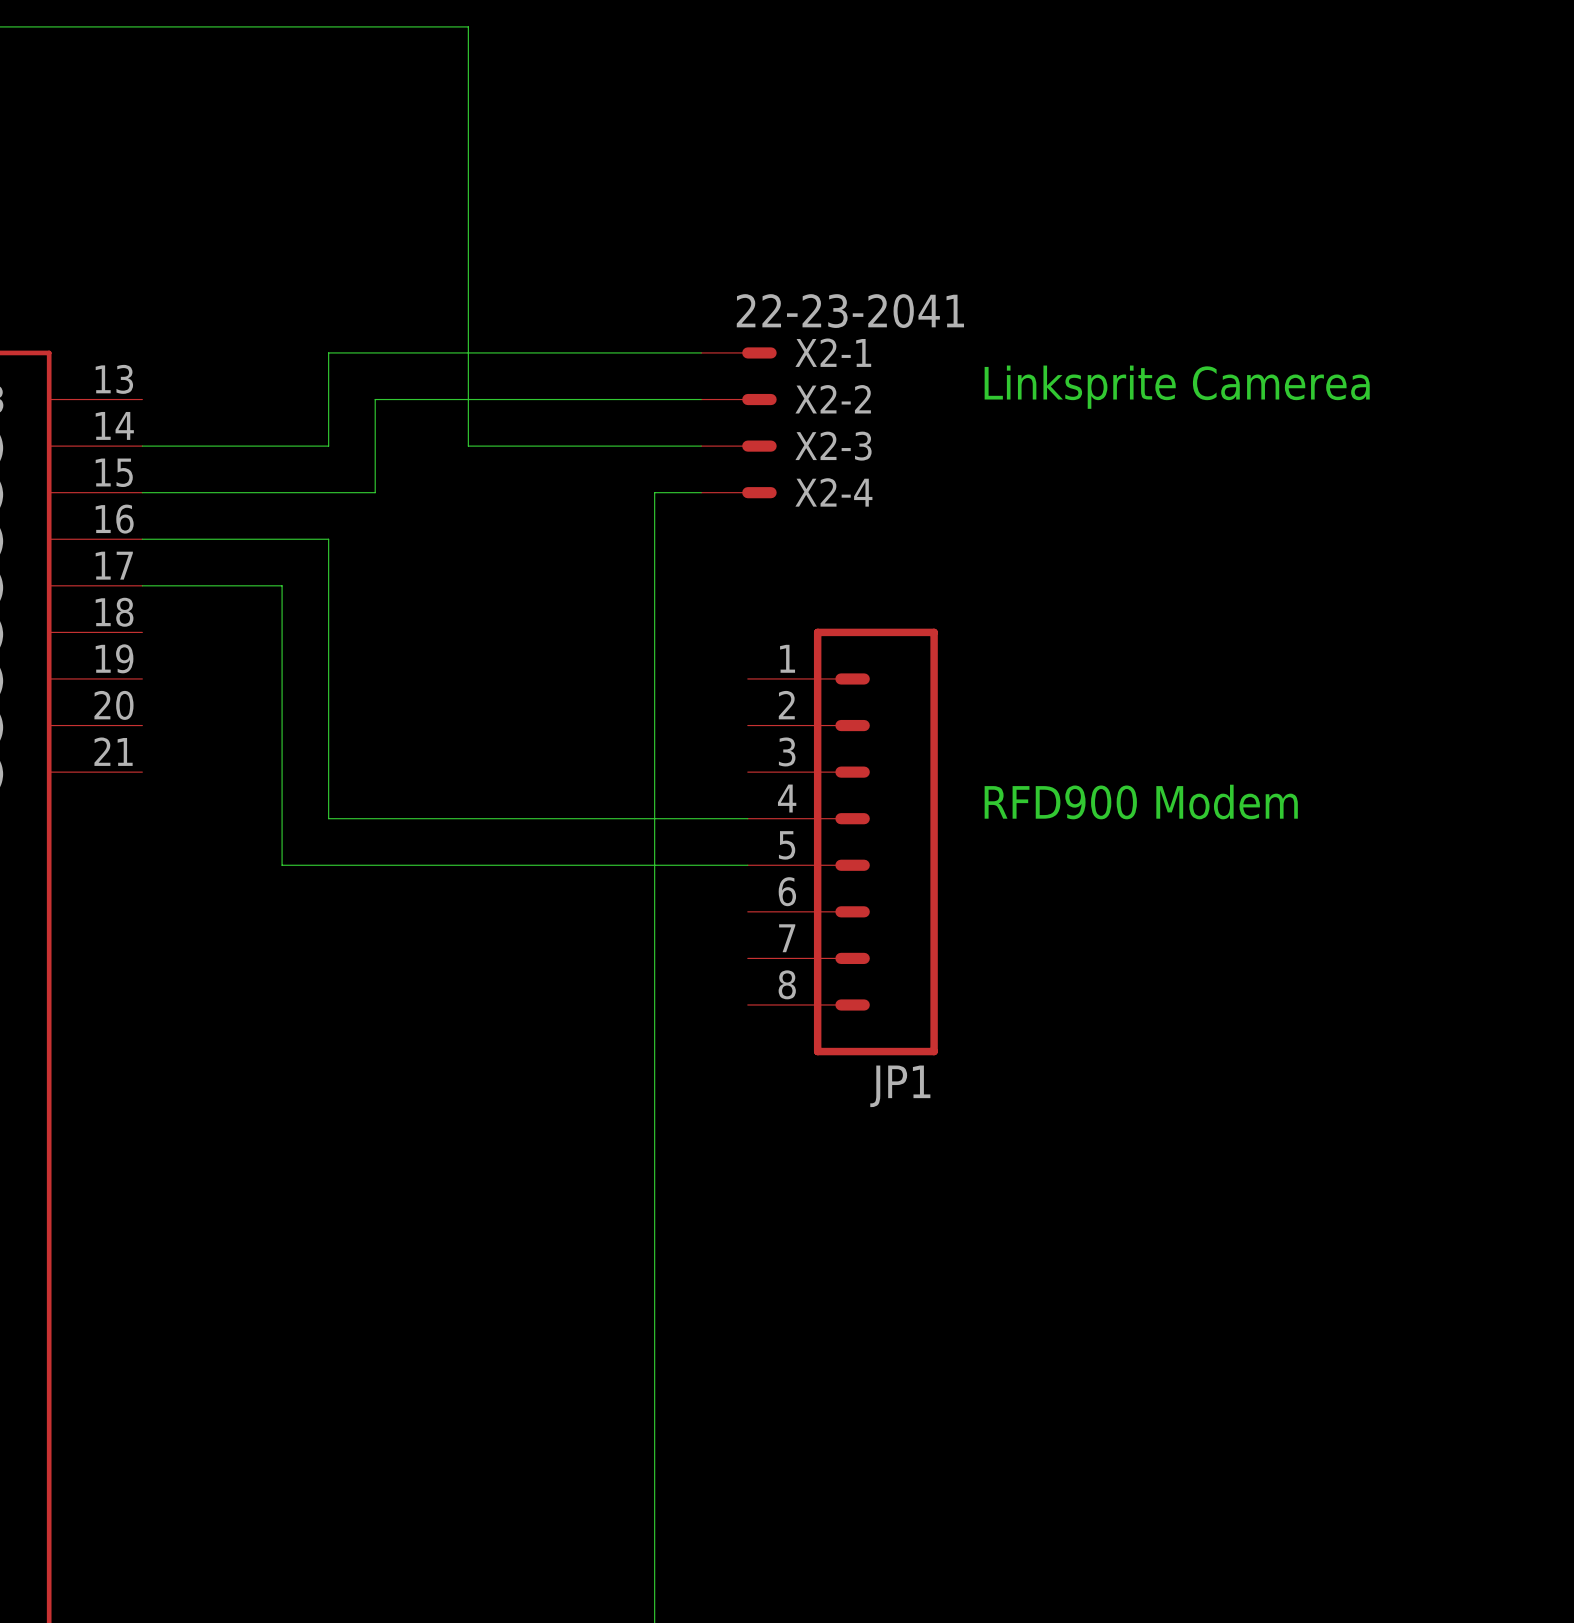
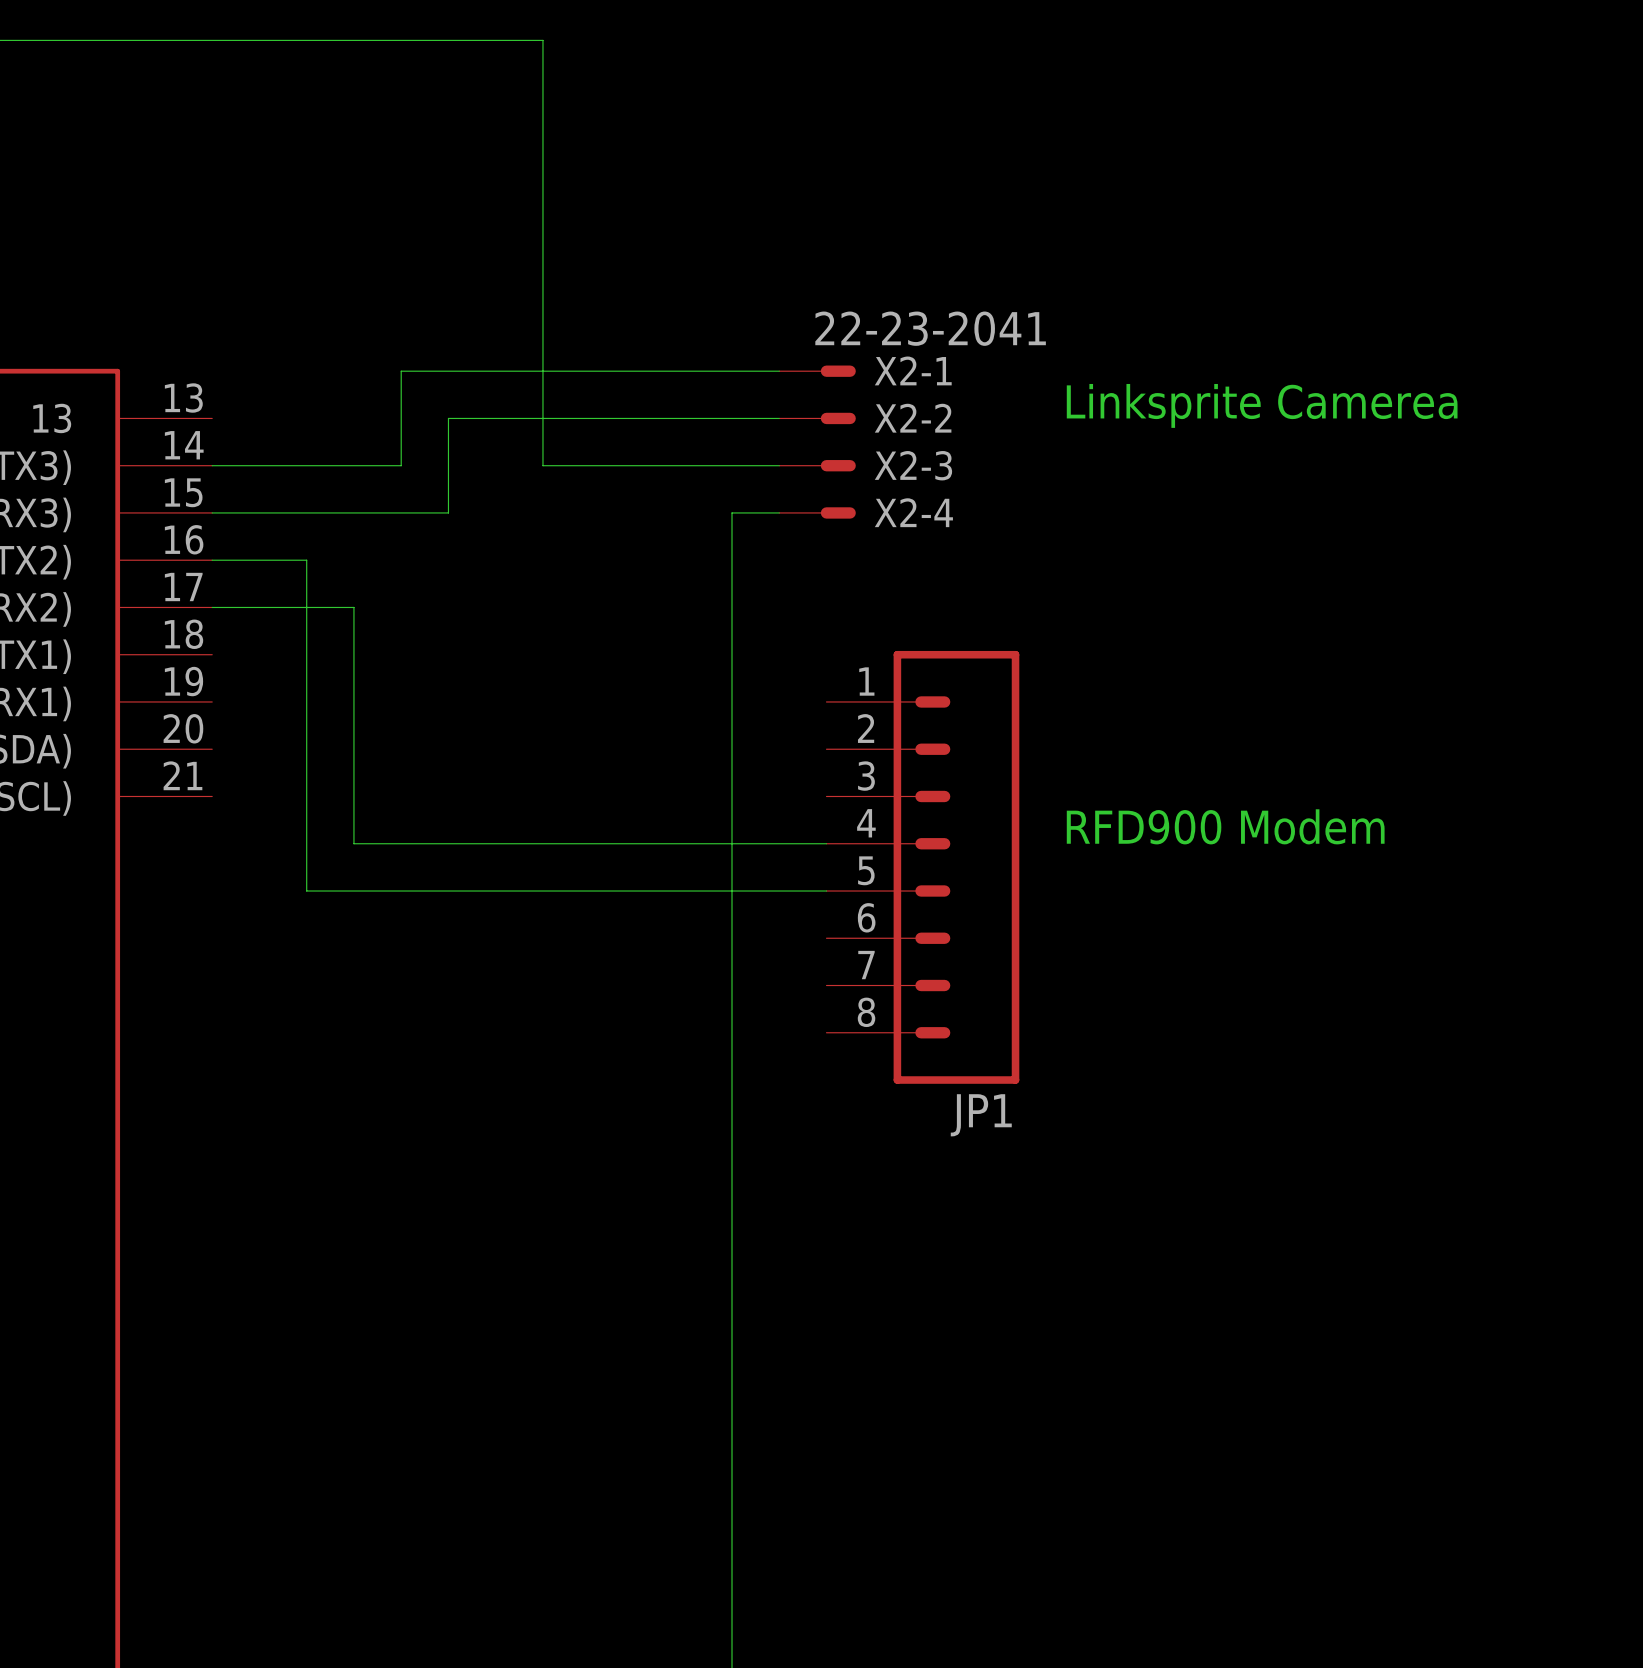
wire: (235, 539) (328, 539) (328, 818) -> (306, 560) (306, 891) (353, 891)
wire: (282, 818) (282, 865) -> (353, 843) (401, 843)

